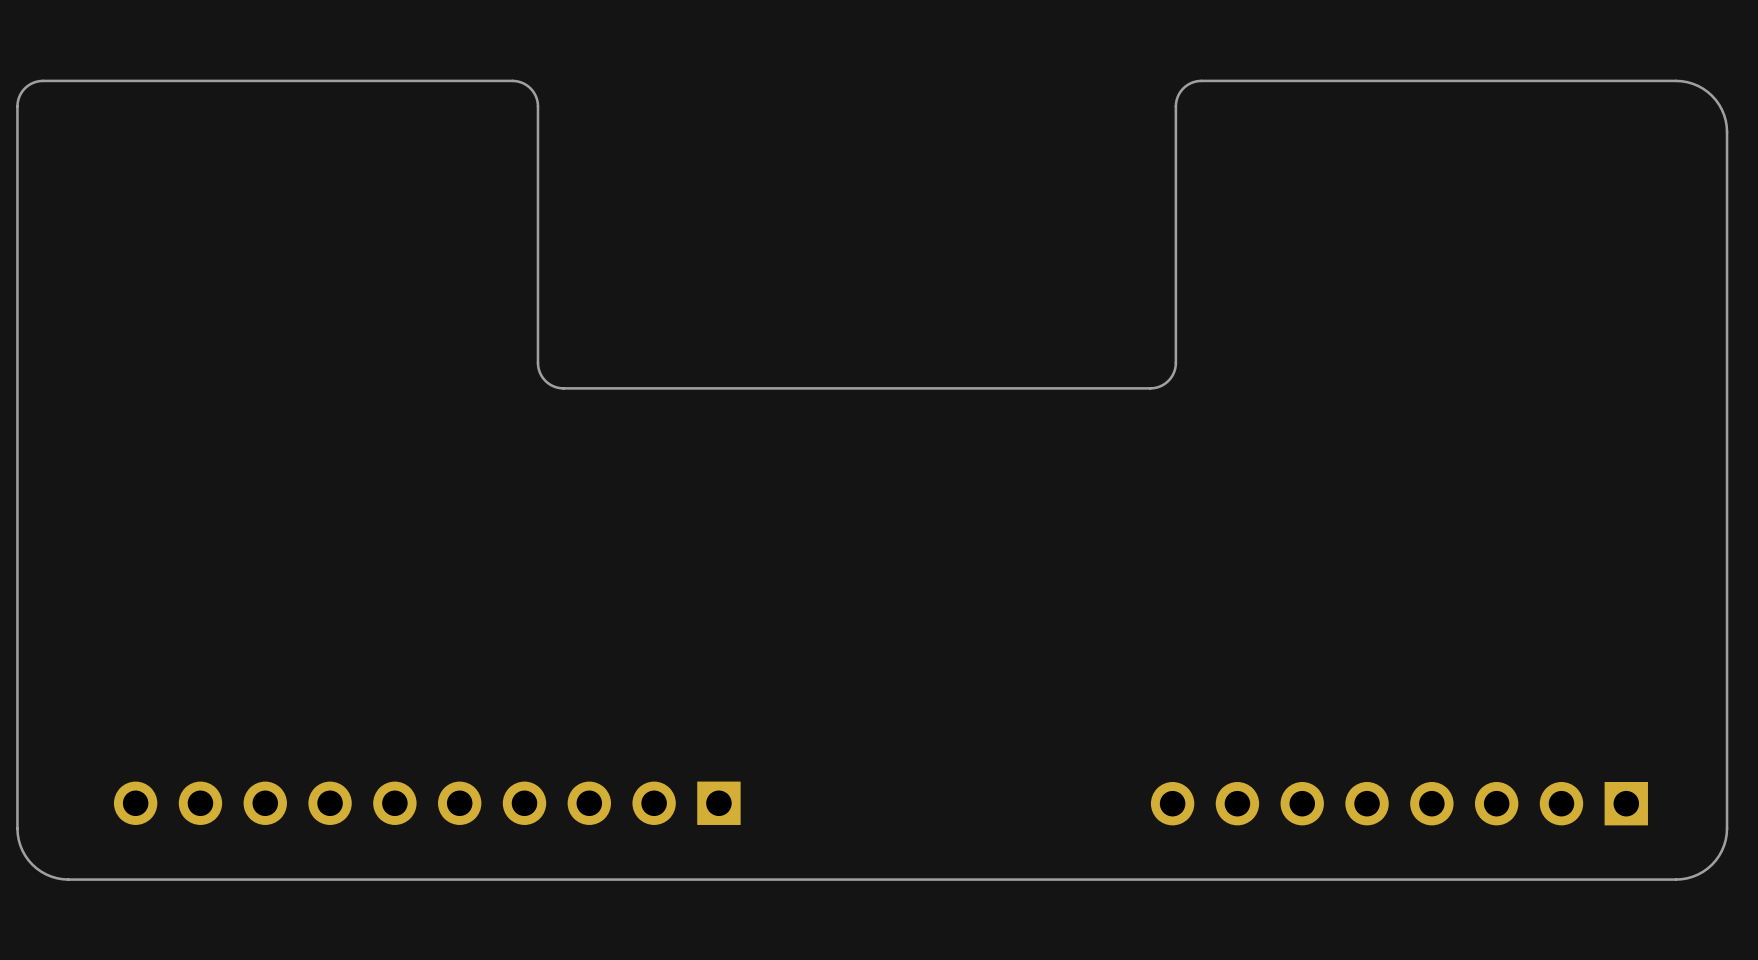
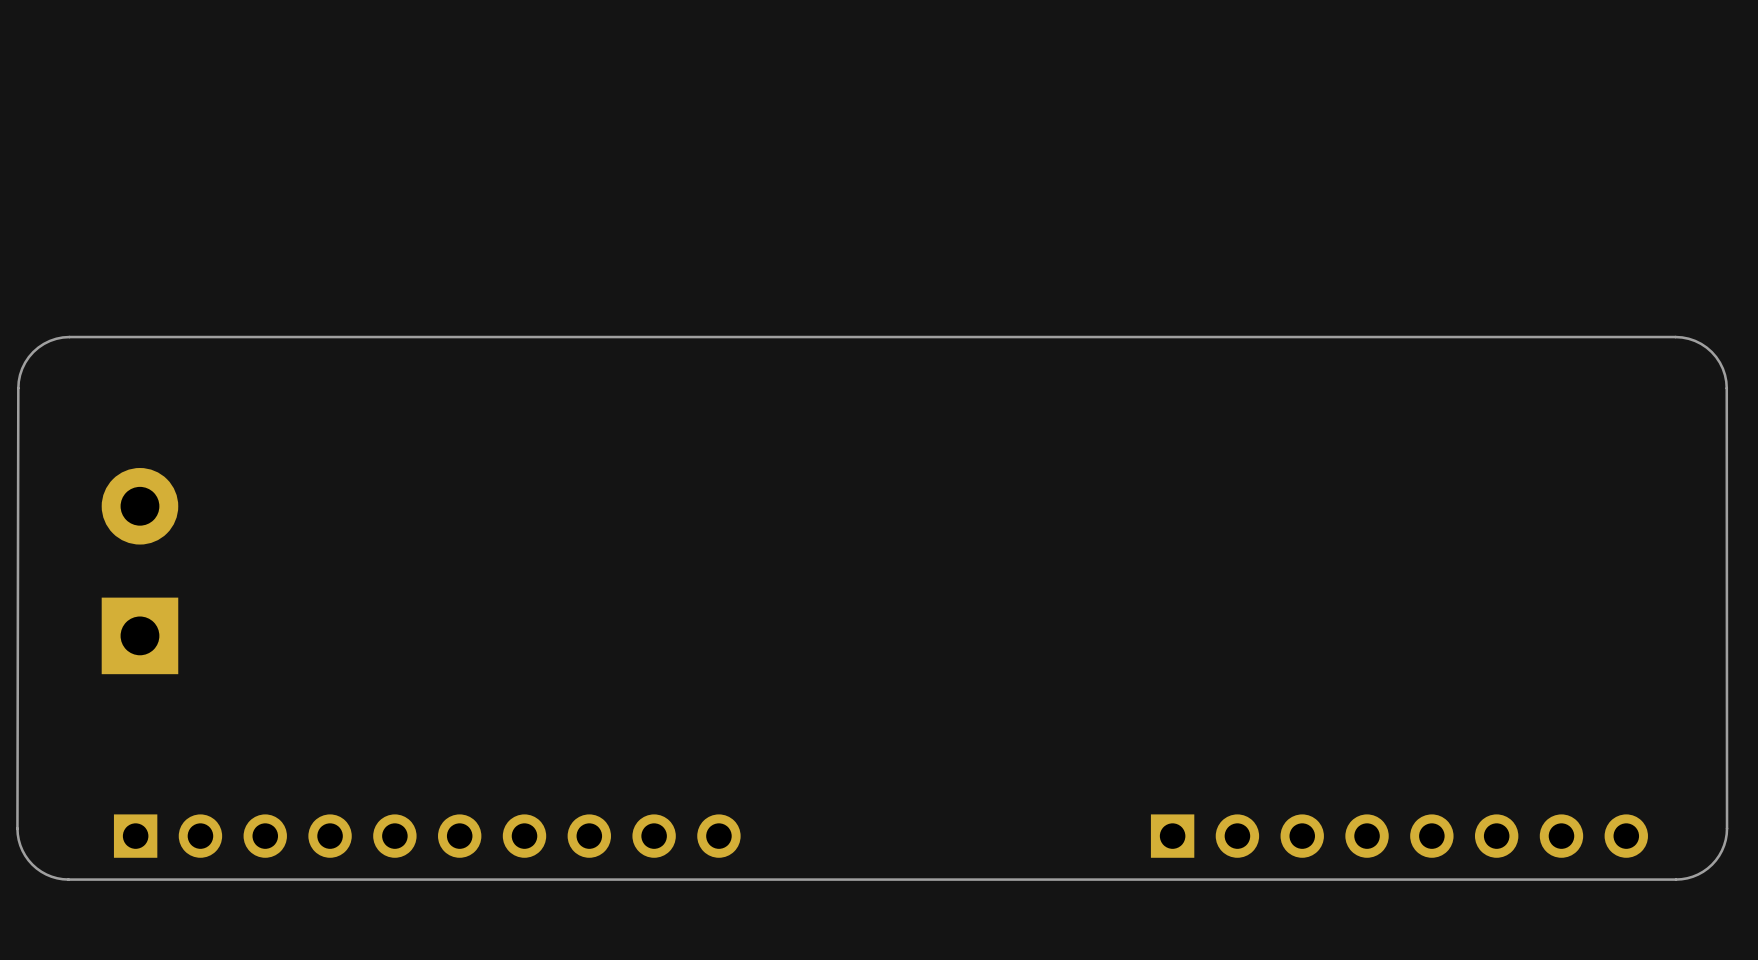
part: none -> (139, 571)
part rotation: 0° (427, 803) -> 180° (427, 836)
part rotation: 0° (1399, 803) -> 180° (1399, 836)
board edge: (1727, 828) (1726, 126) (1721, 109) (1707, 92) (1692, 83) (1675, 80) (1201, 80) (1187, 84) (1179, 92) (1175, 106) (1175, 365) (1171, 376) (1166, 382) (1150, 388) (557, 387) (543, 378) (538, 365) (537, 106) (535, 95) (526, 84) (512, 80) (42, 80) (31, 83) (21, 92) (17, 106) (17, 828) -> (1727, 828) (1726, 381) (1719, 362) (1706, 347) (1688, 338) (1675, 337) (69, 337) (56, 338) (43, 343) (33, 352) (25, 362) (18, 381) (17, 828)

